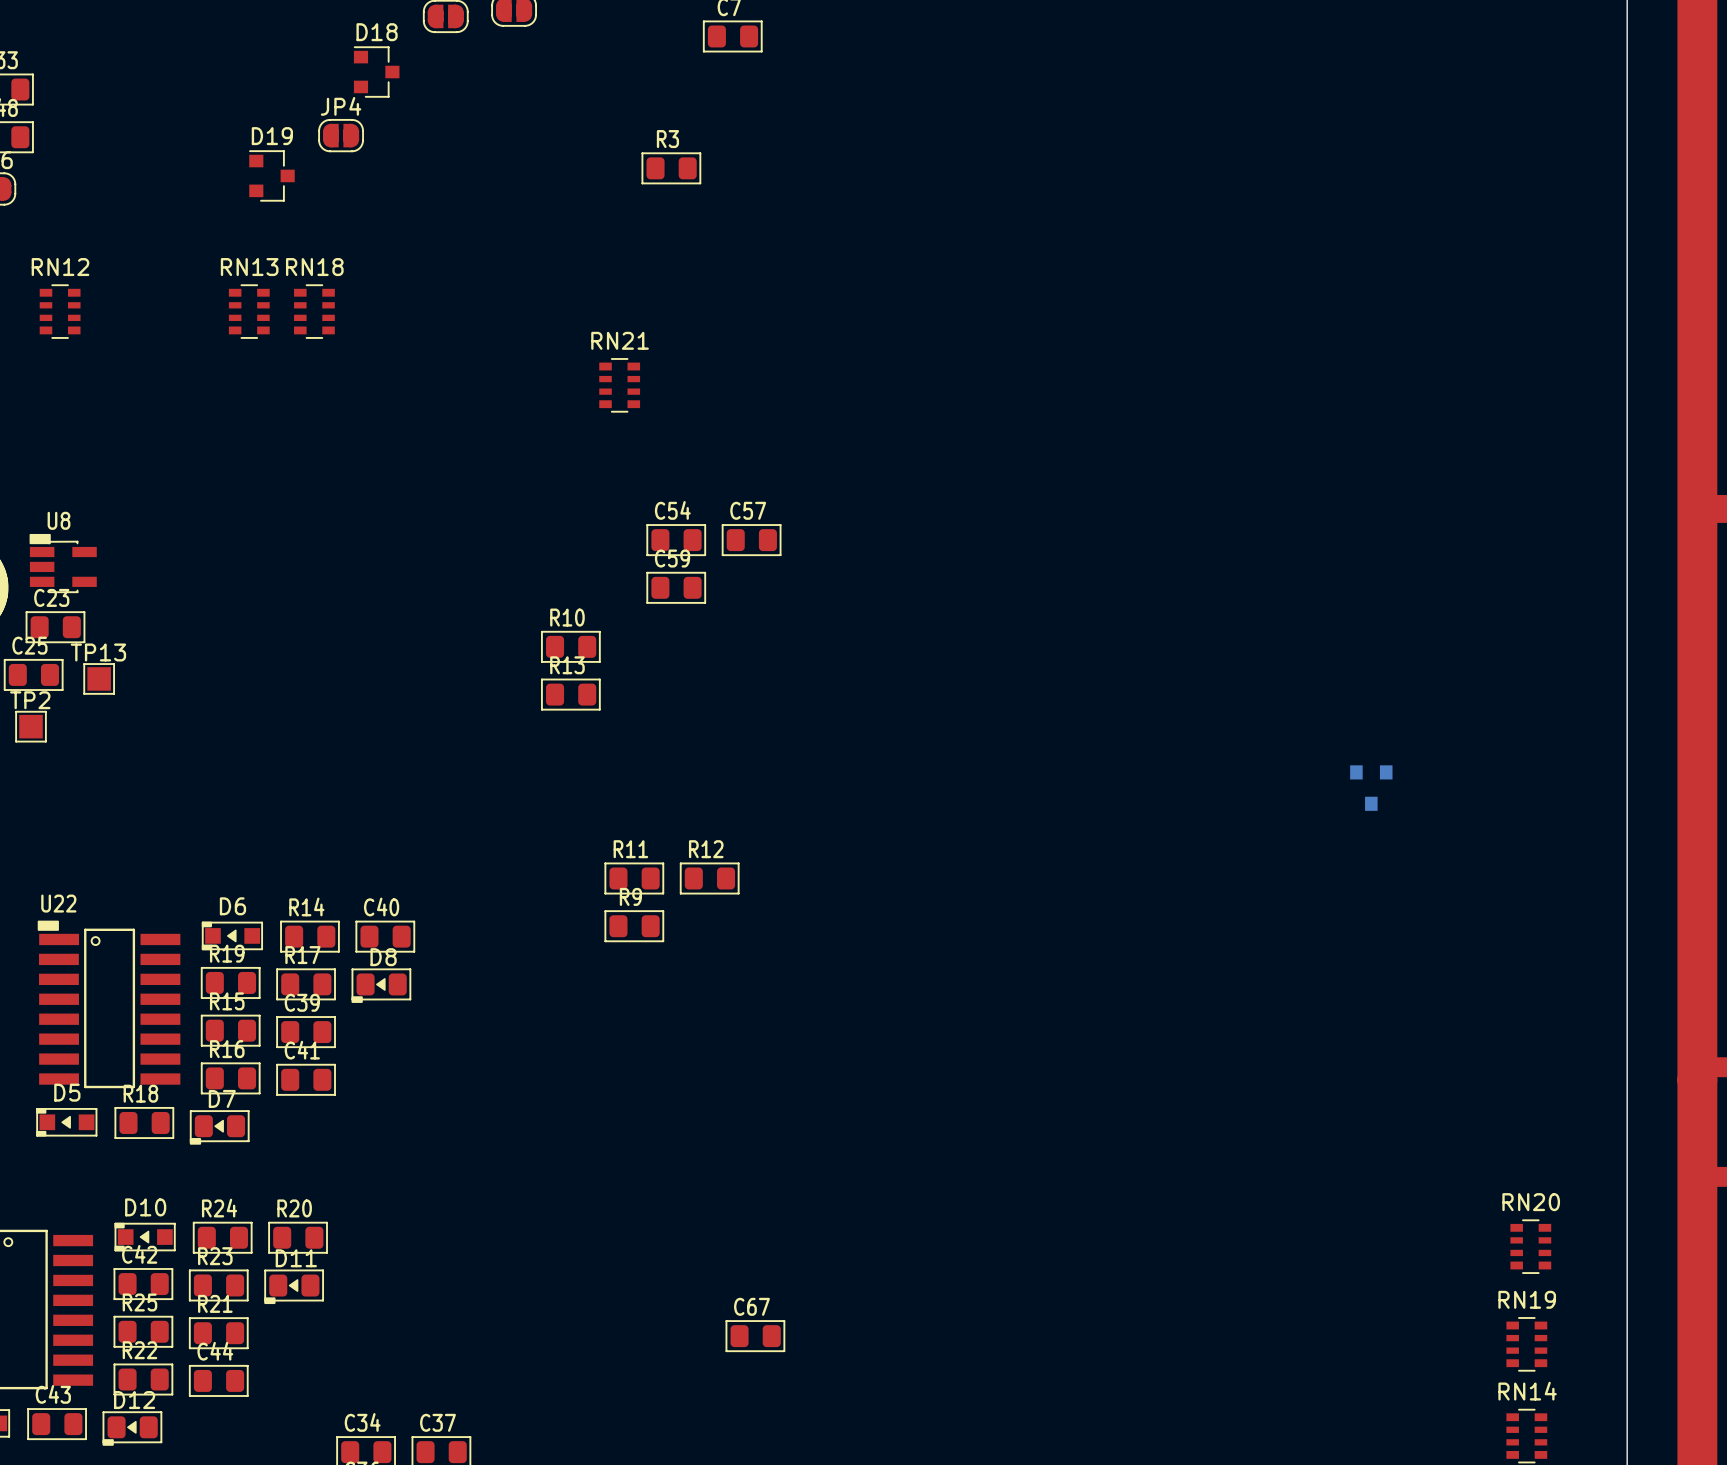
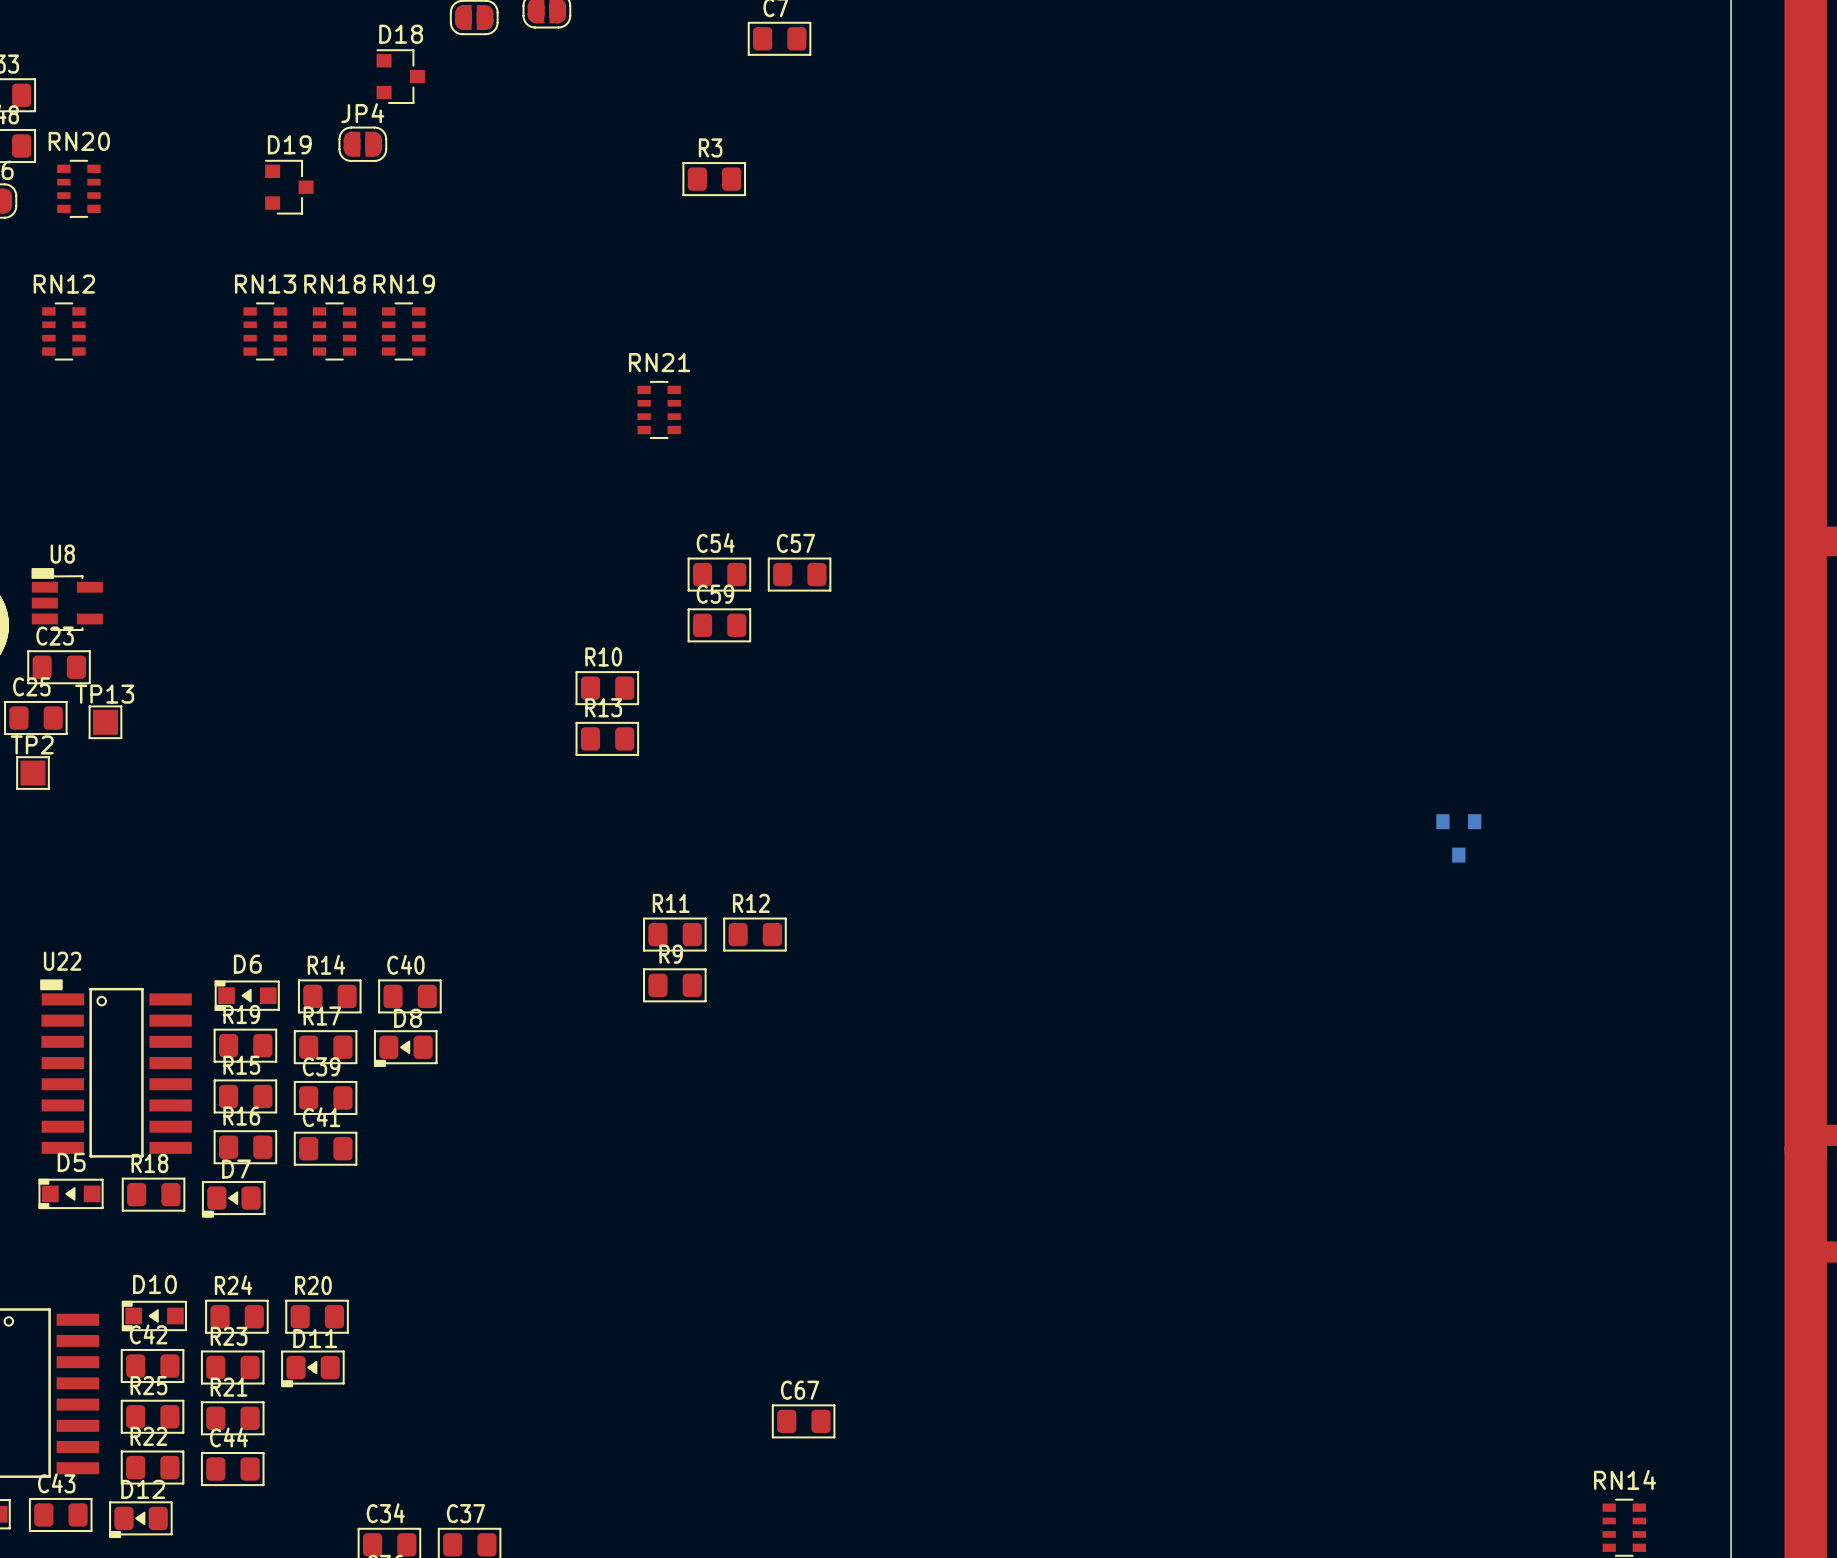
RN20 position: (1530, 1246) -> (78, 188)
RN19 position: (1526, 1344) -> (403, 331)

